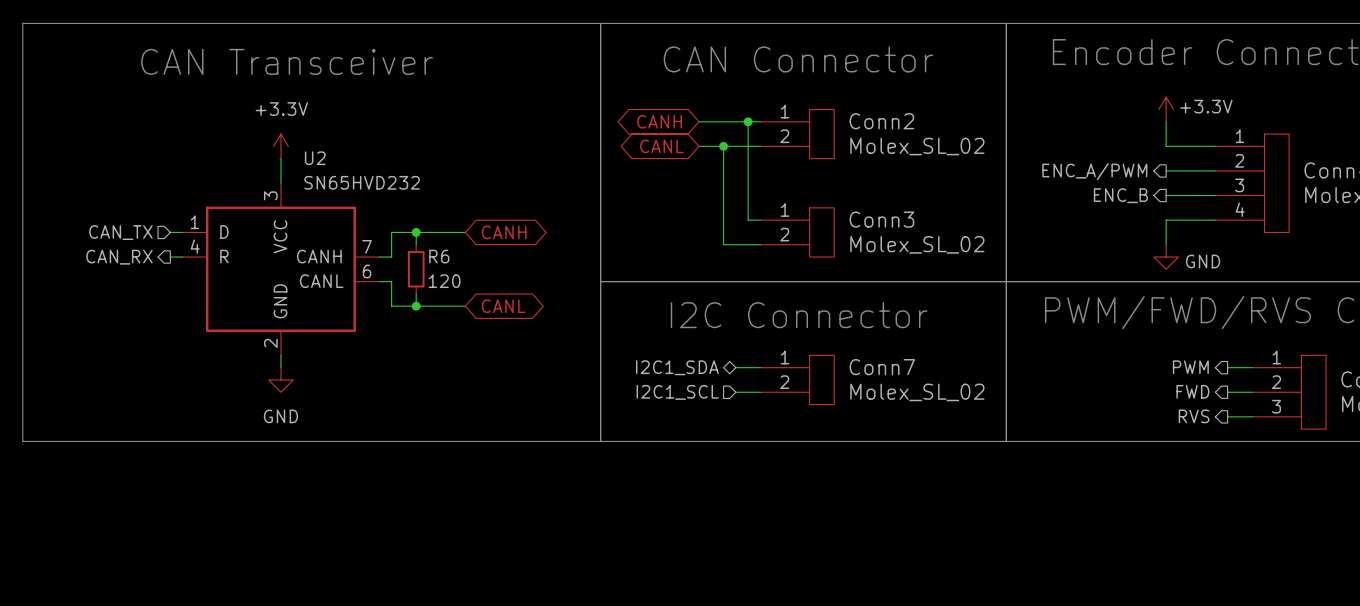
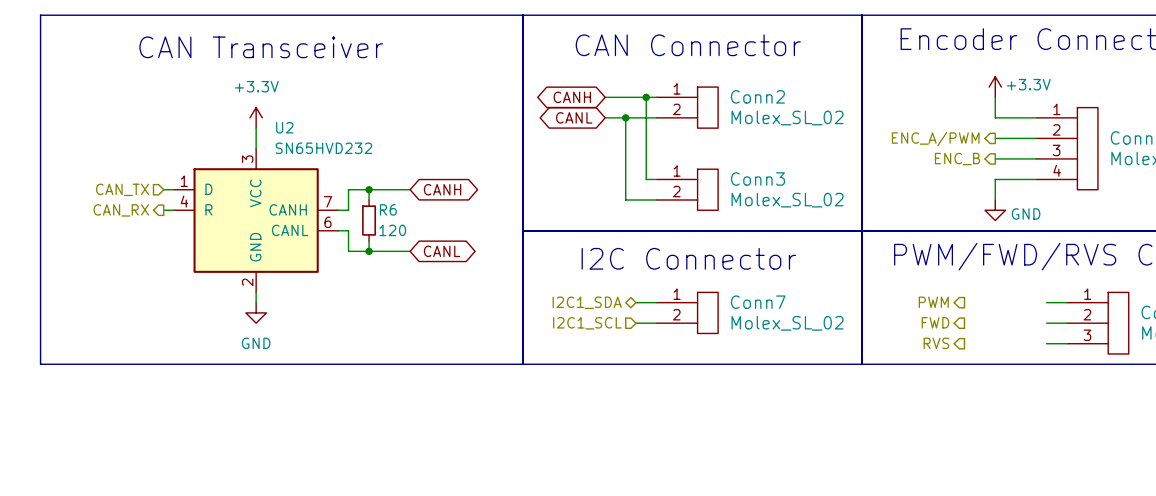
hierarchical label position: PWM (1190, 367) -> PWM (933, 302)
hierarchical label position: FWD (1192, 391) -> FWD (935, 322)
hierarchical label position: RVS (1194, 416) -> RVS (936, 343)

